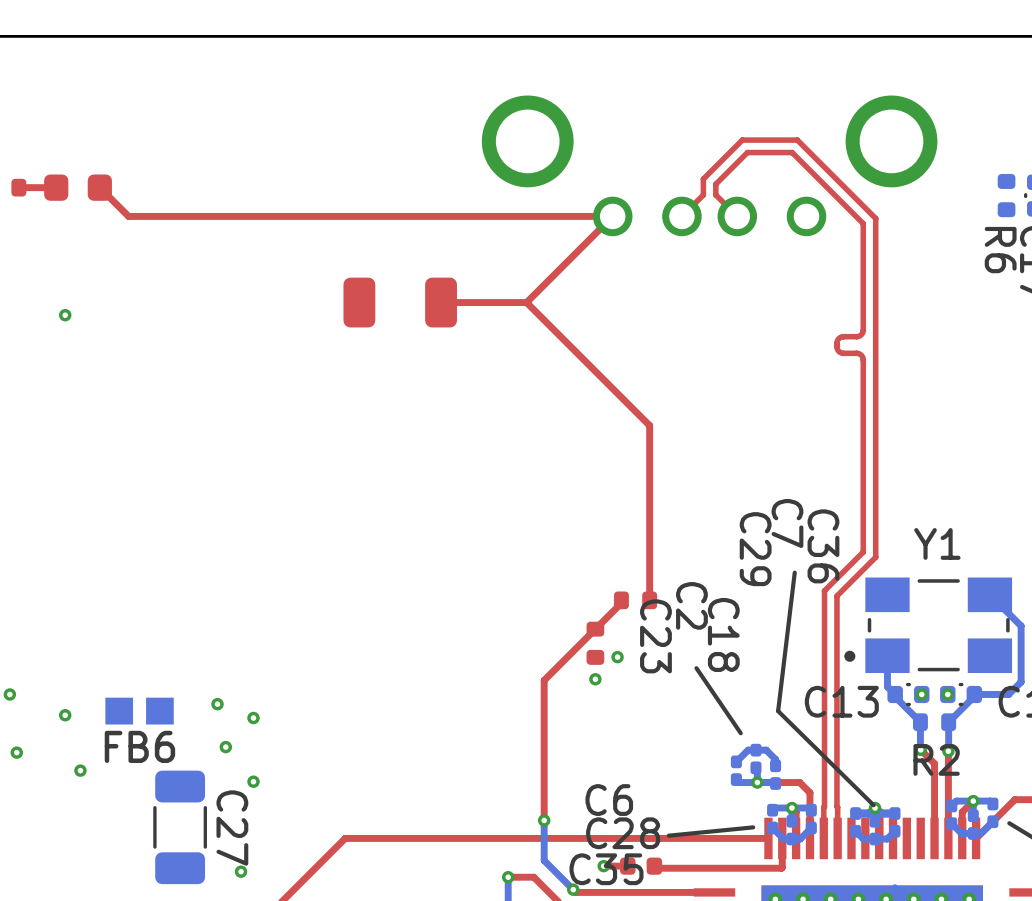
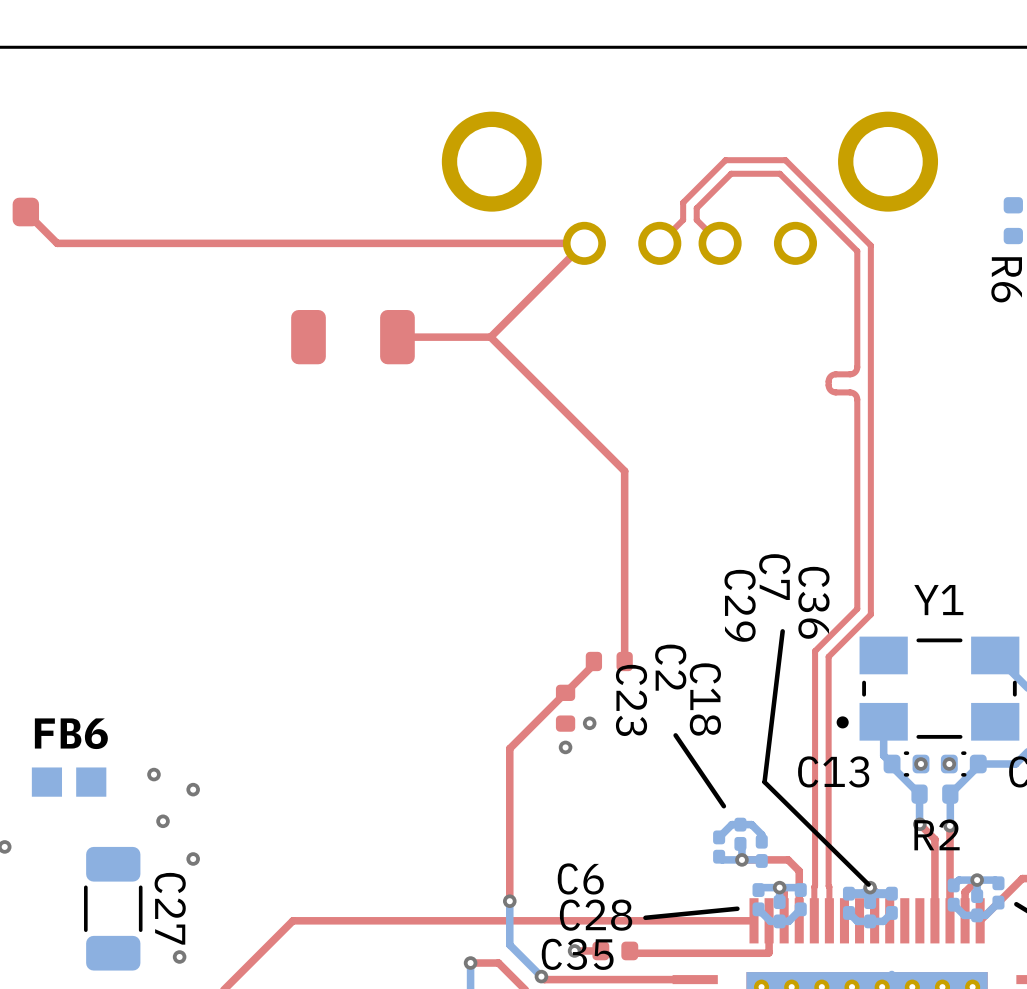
FB6 name position: FB6 (139, 746) -> FB6 (71, 733)

